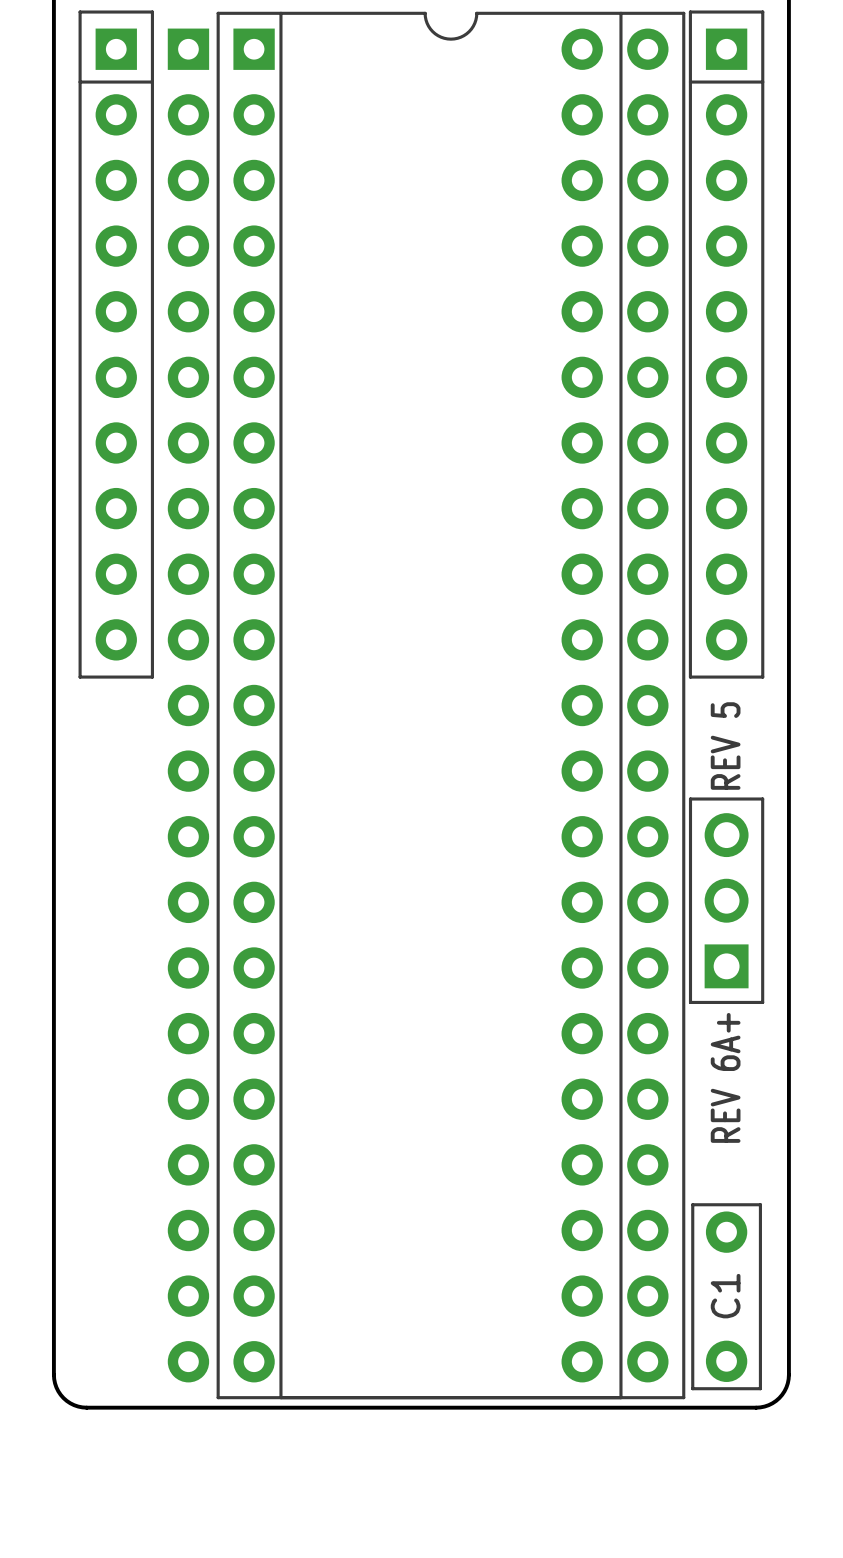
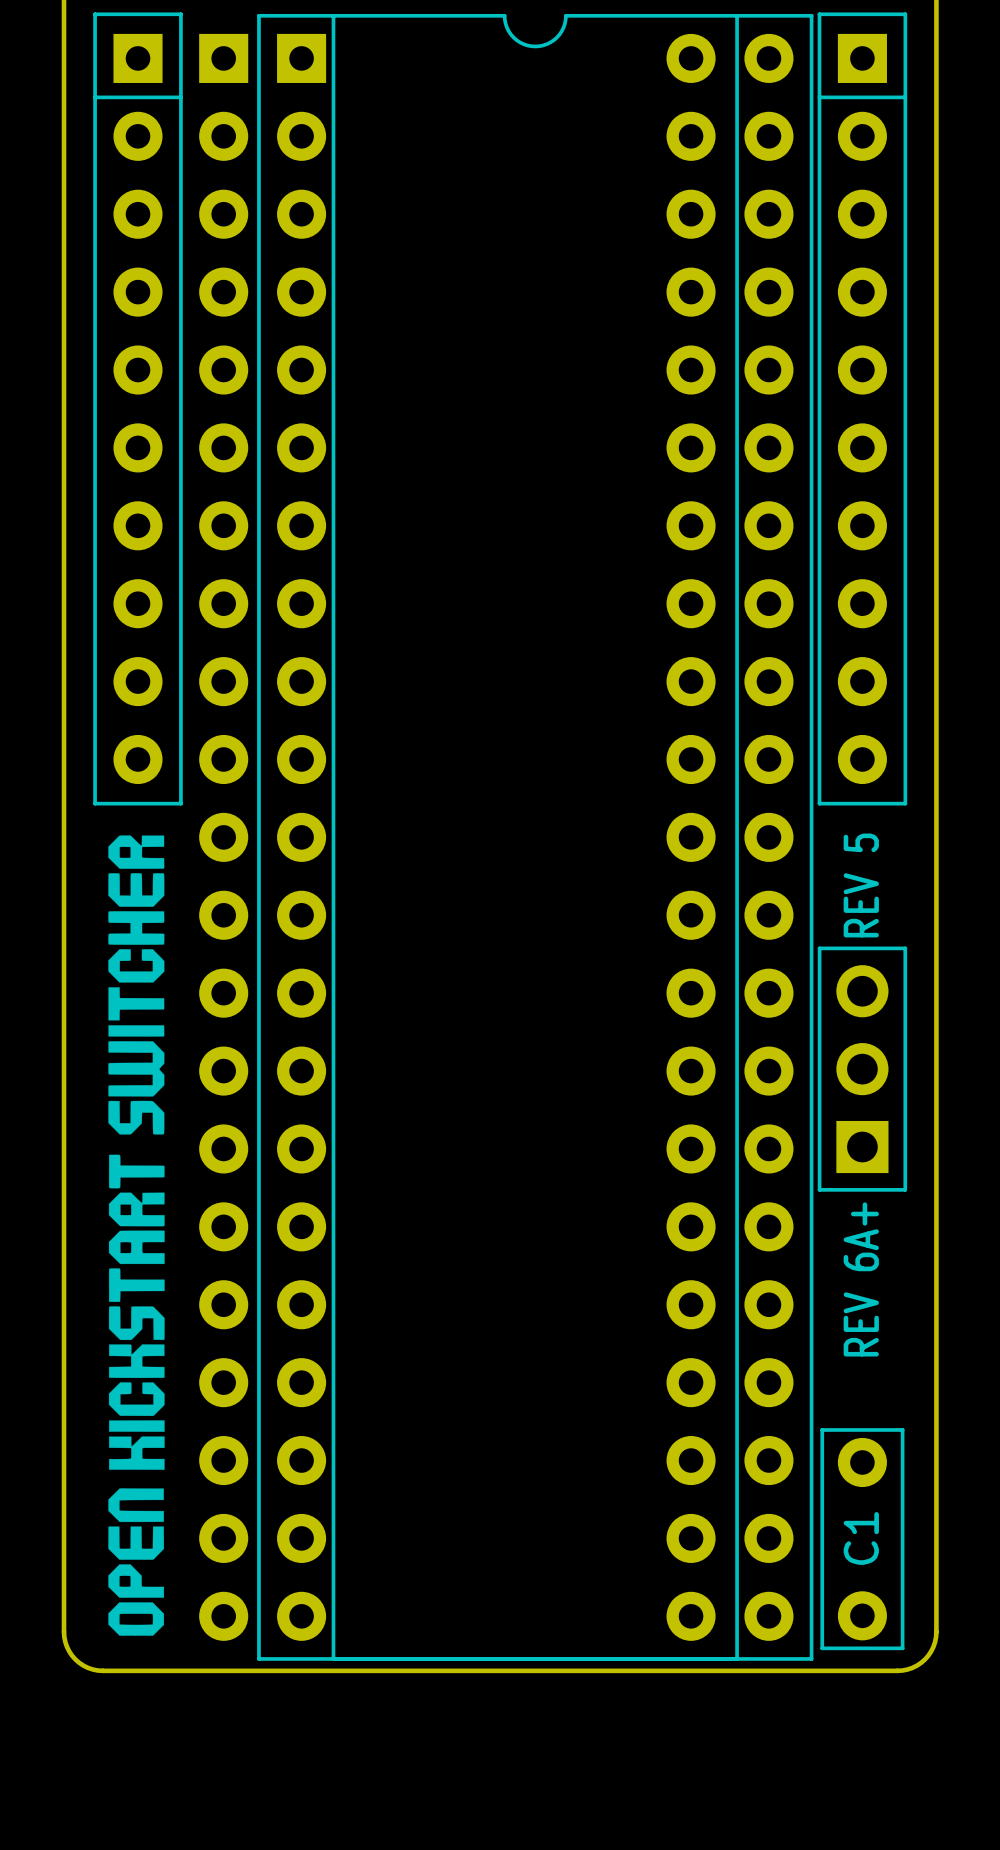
drawing: none -> [108, 835, 165, 1636]

